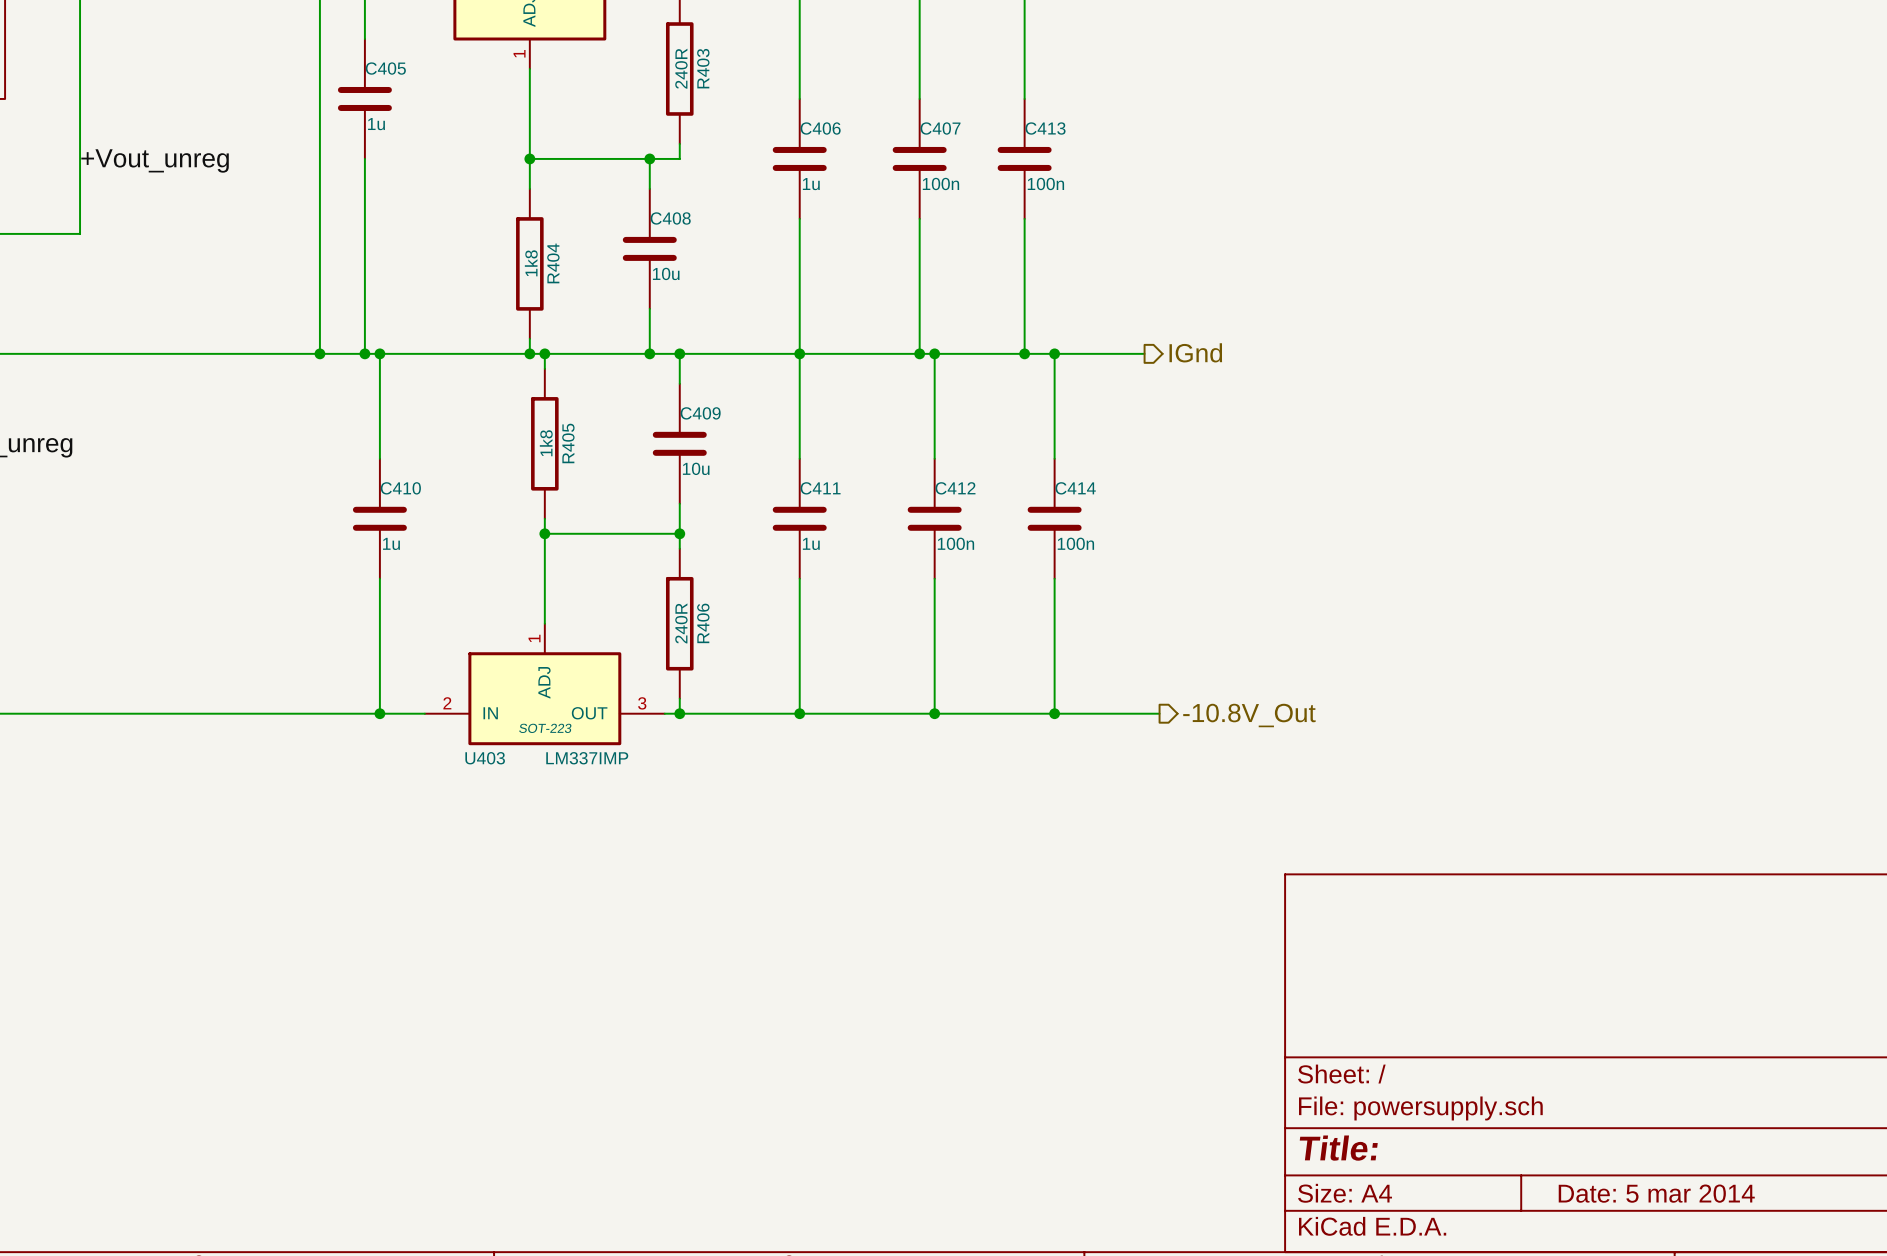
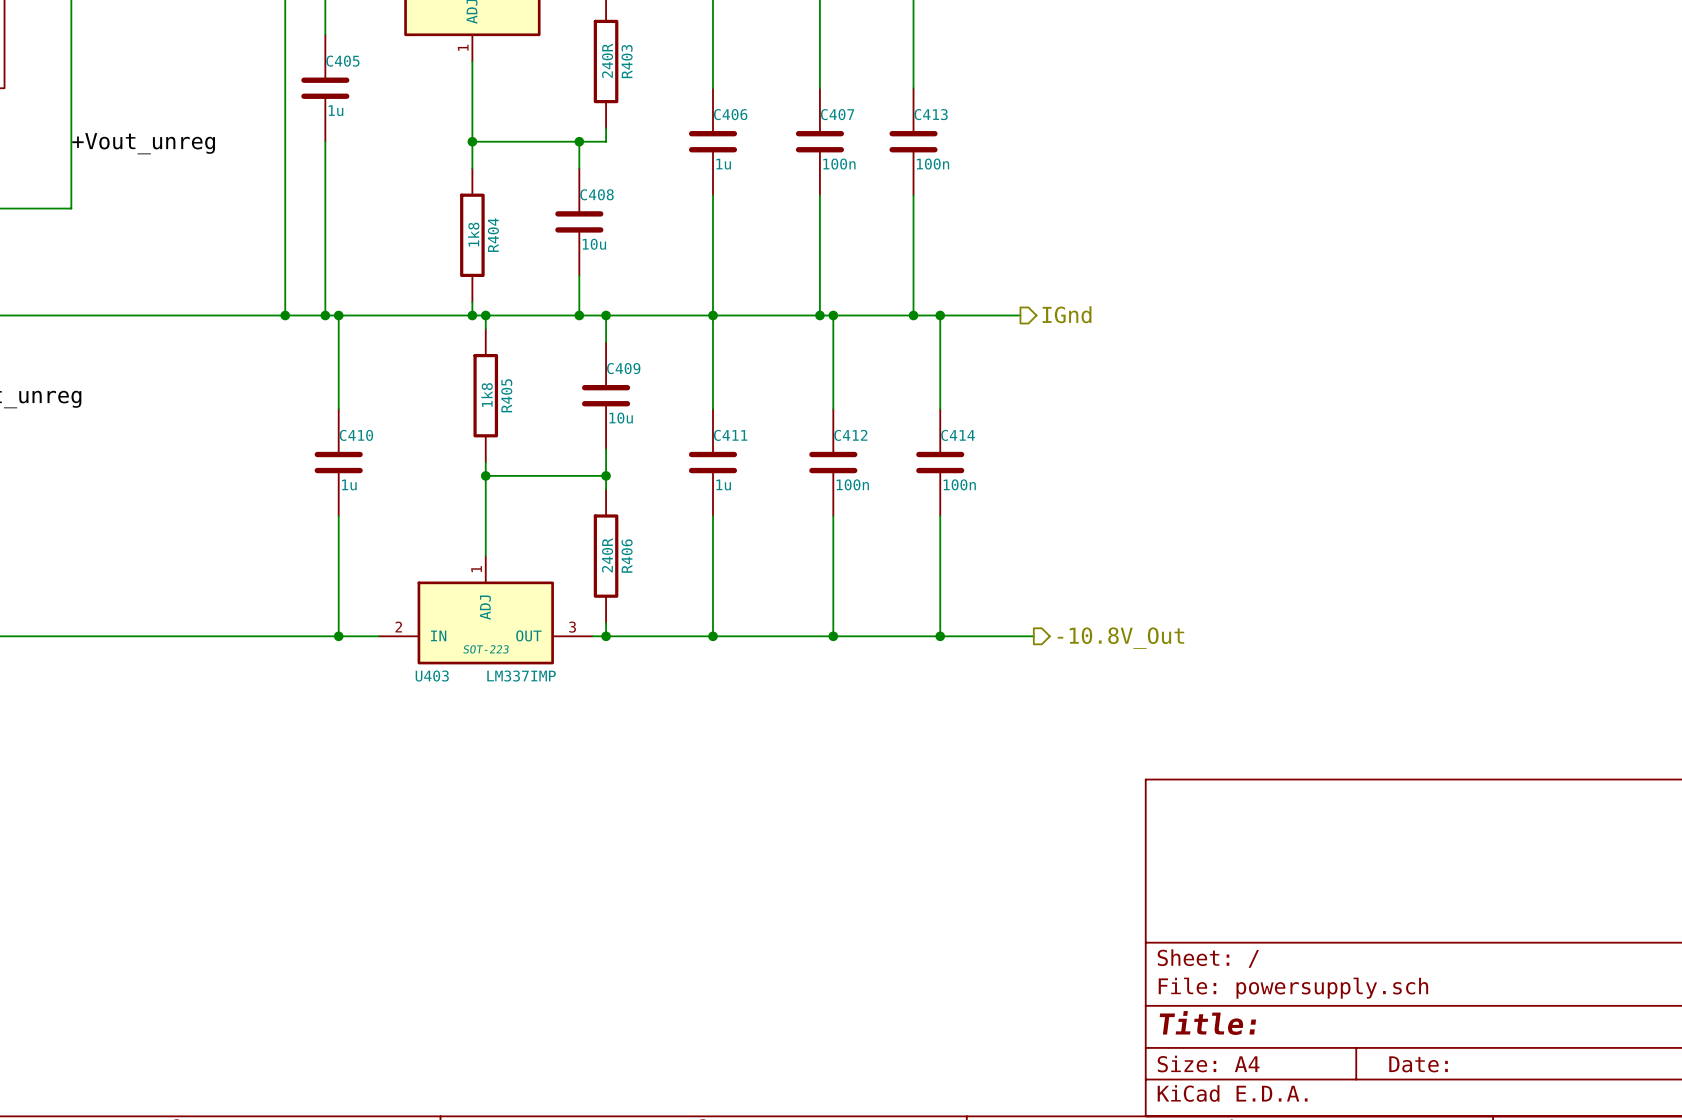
title block: Date: 5 mar 2014 (1656, 1193) -> Date: (1418, 1064)

